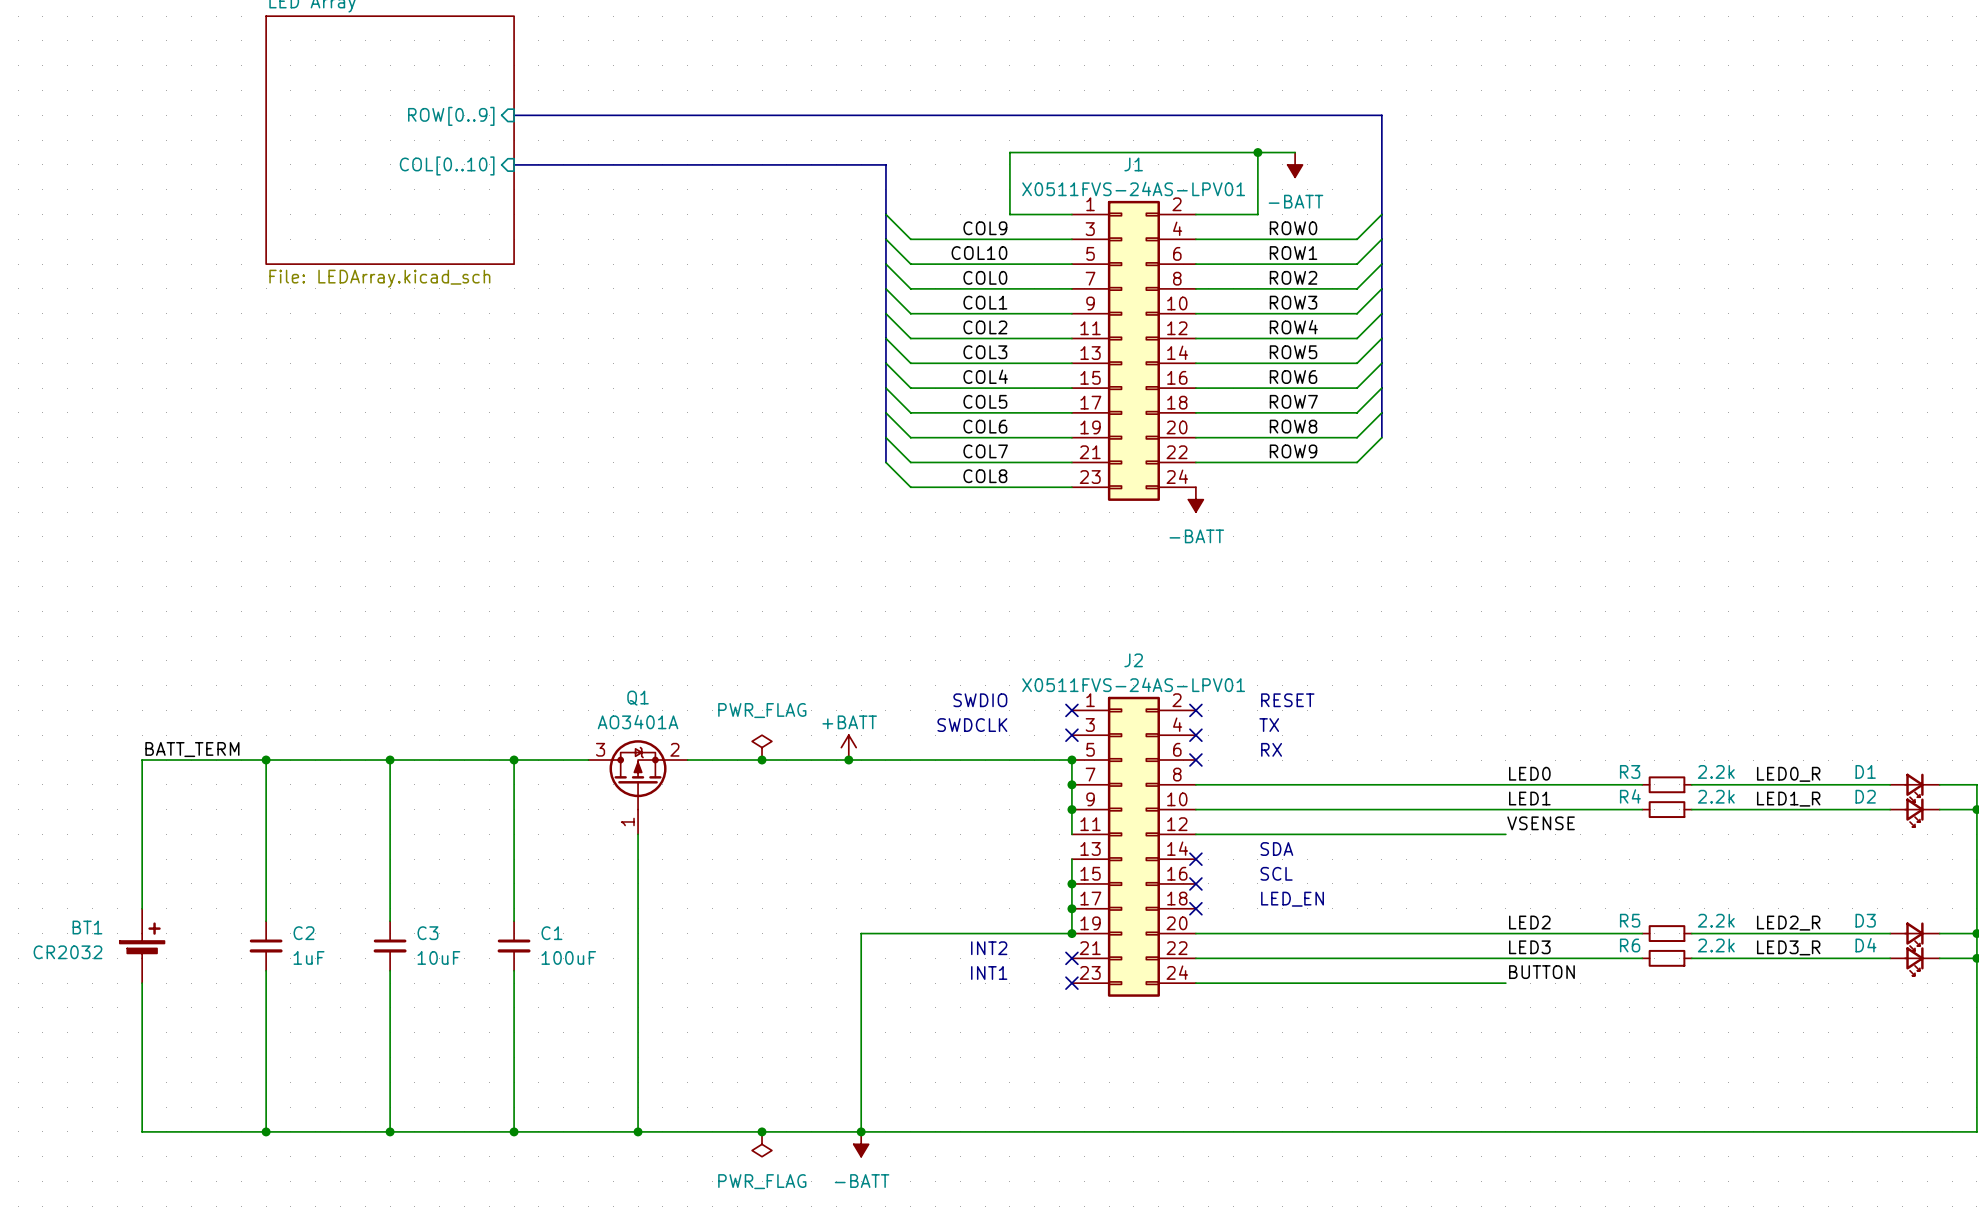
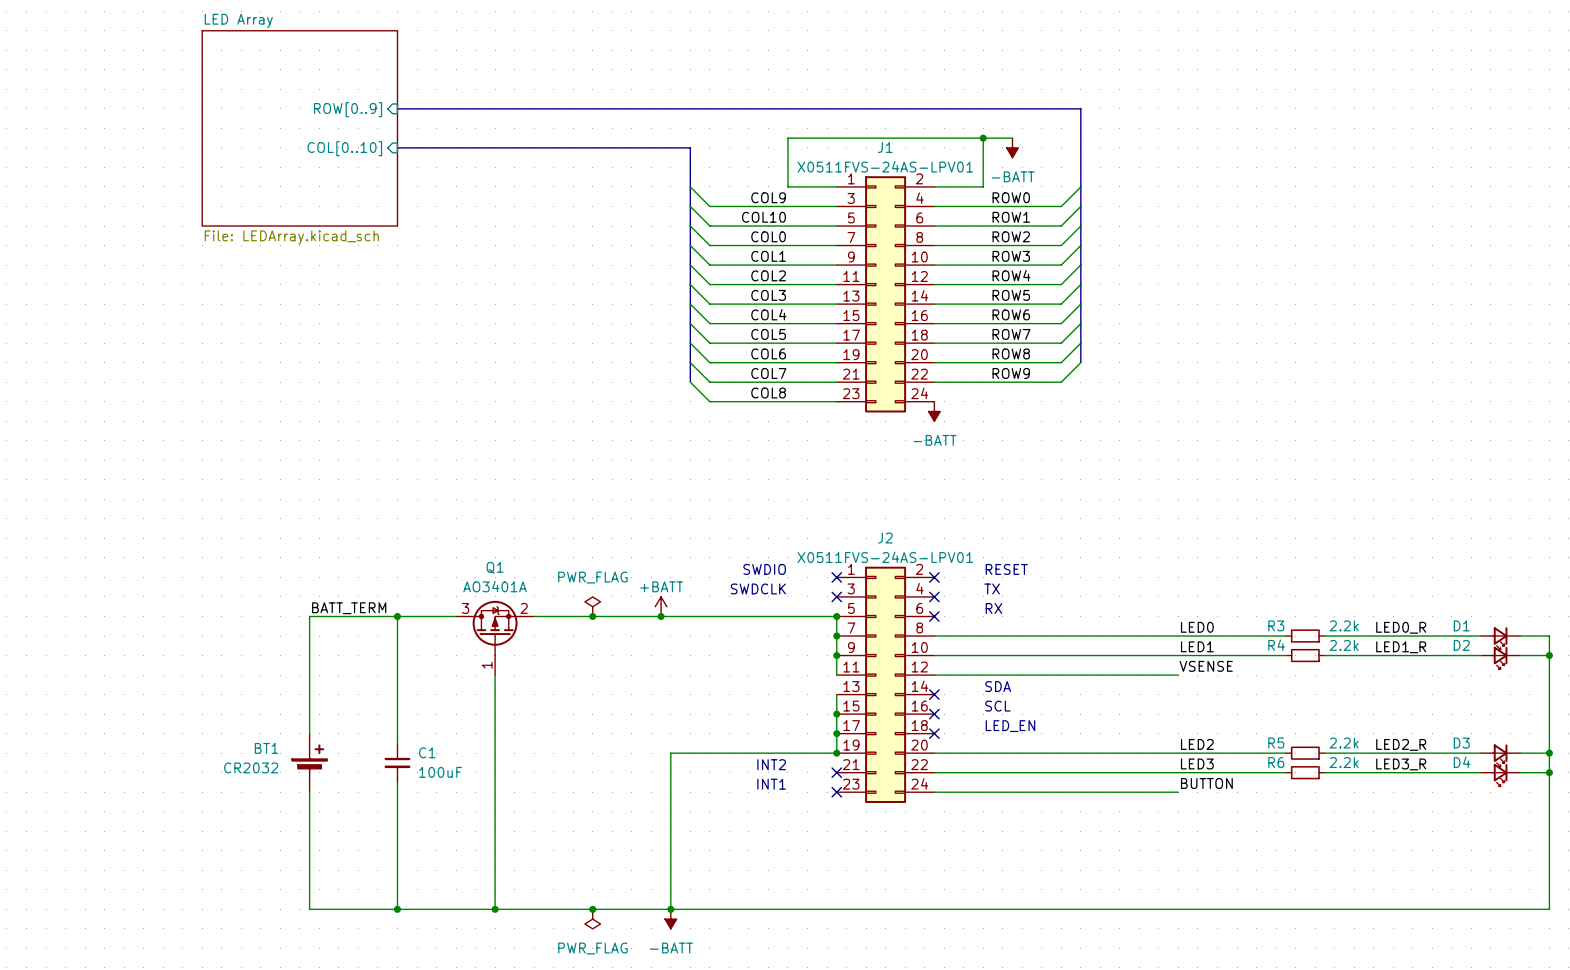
label: BATT_TERM (192, 749) -> none
label: none -> BATT_TERM (349, 608)
wire: (266, 760) (266, 921) -> none
junction: (266, 760) -> none
wire: (390, 760) (390, 921) -> none
junction: (390, 760) -> none
wire: (402, 760) (142, 760) (142, 908) -> (309, 616) (309, 733)
BT1 position: (142, 945) -> (309, 762)
C2: 1uF (266, 945) -> none
C3: 10uF (390, 945) -> none
wire: (266, 970) (266, 1131) -> none
wire: (390, 970) (390, 1131) -> none
wire: (142, 983) (142, 1131) (402, 1131) -> (309, 792) (309, 909)
junction: (266, 1131) -> none
junction: (390, 1131) -> none

